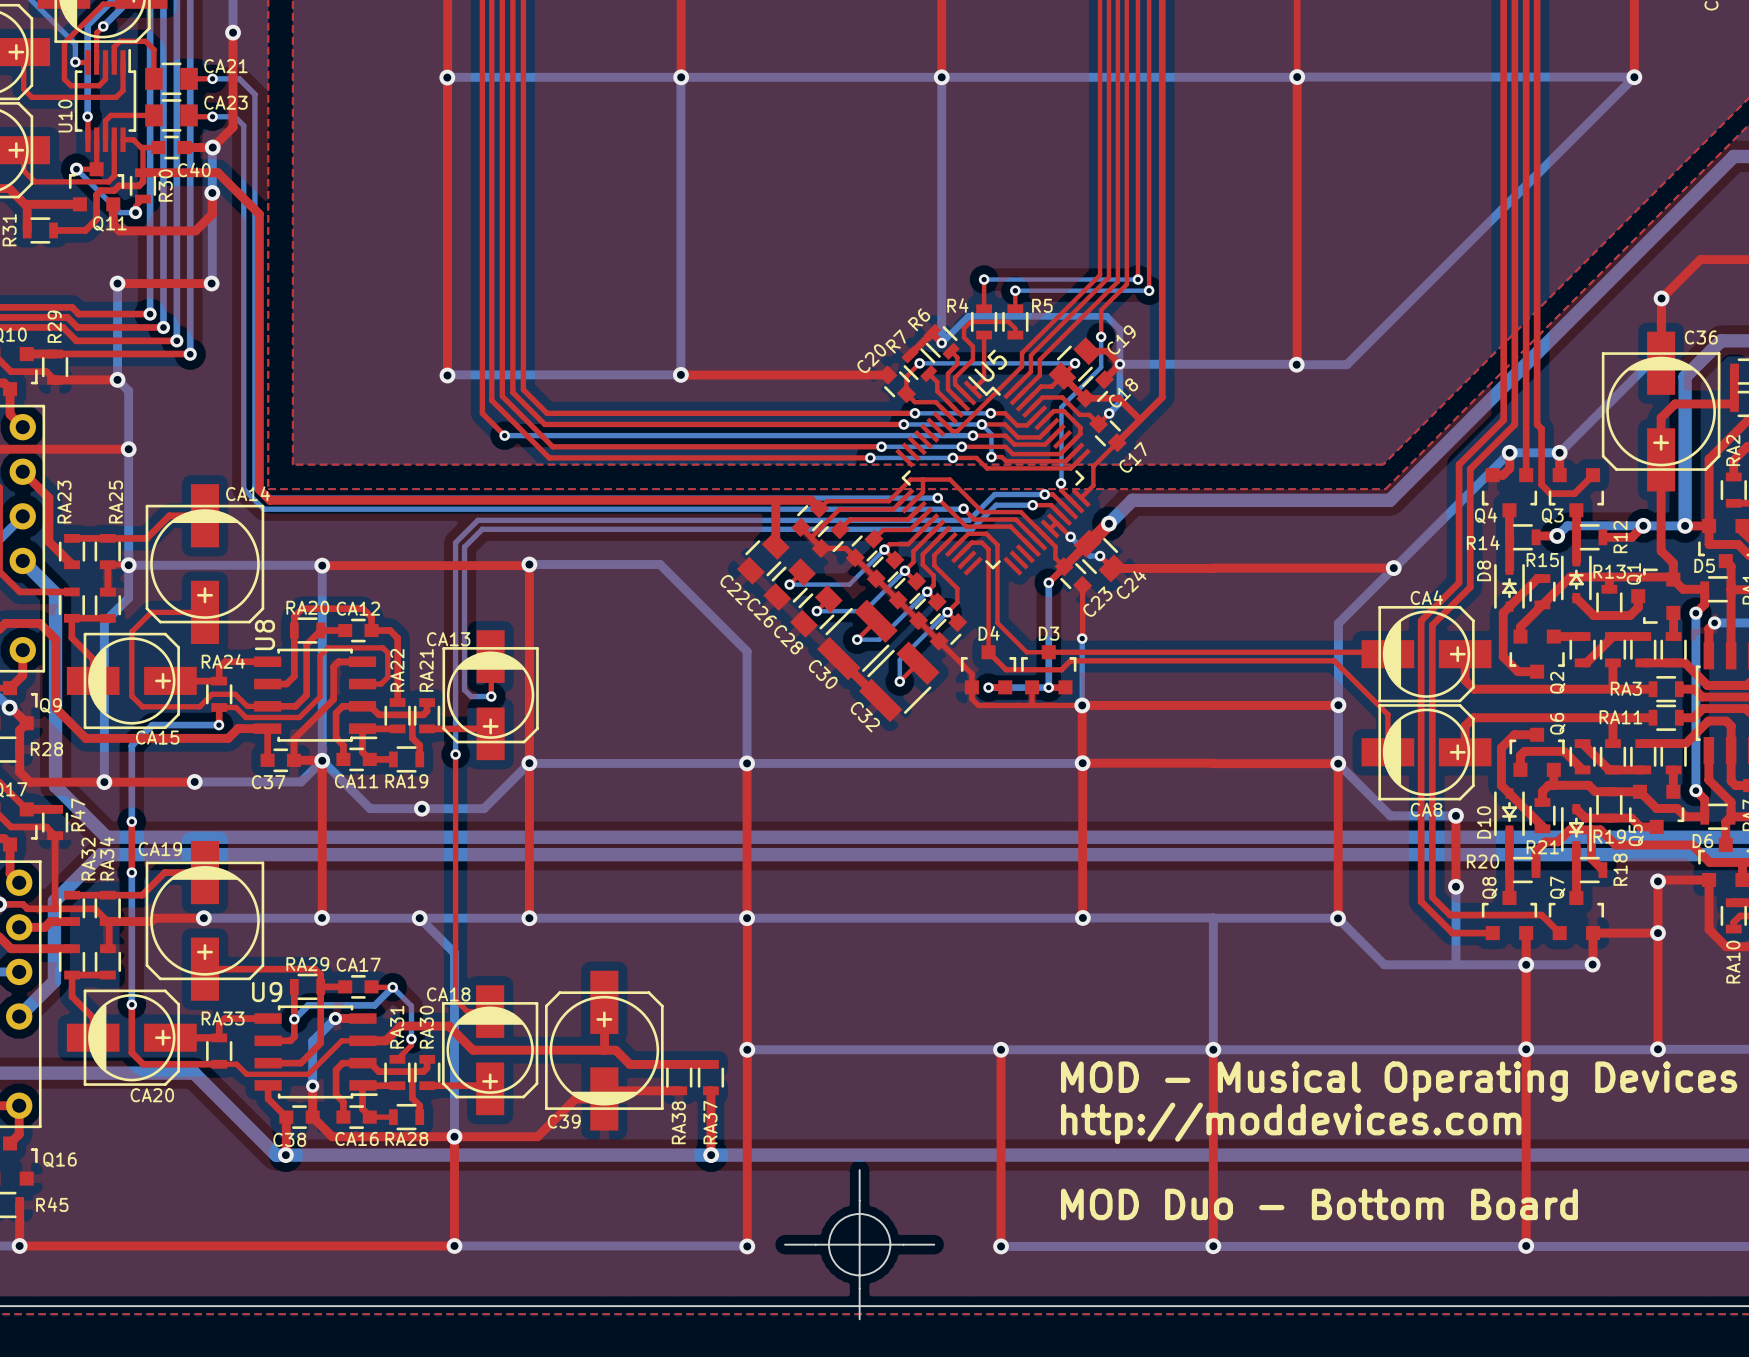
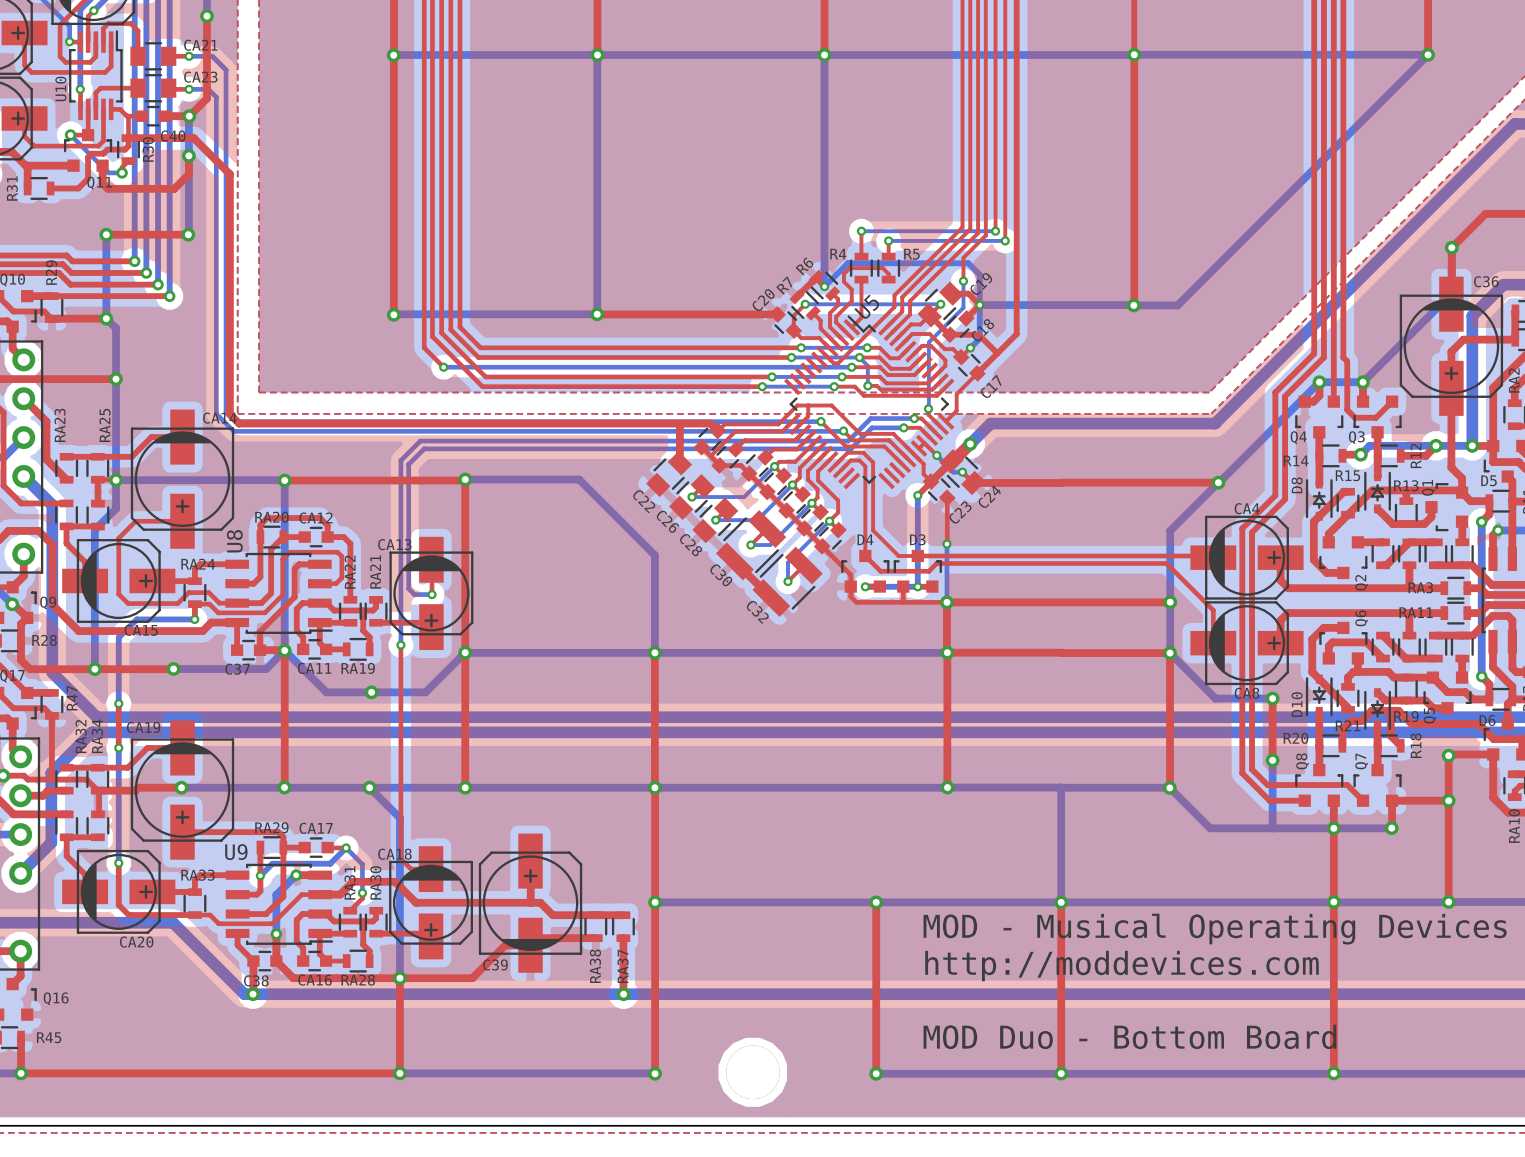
board edge: (859, 1170) (859, 1319) -> none
round board edge: [828, 1213, 892, 1277] -> none
board edge: (785, 1244) (934, 1244) -> none

